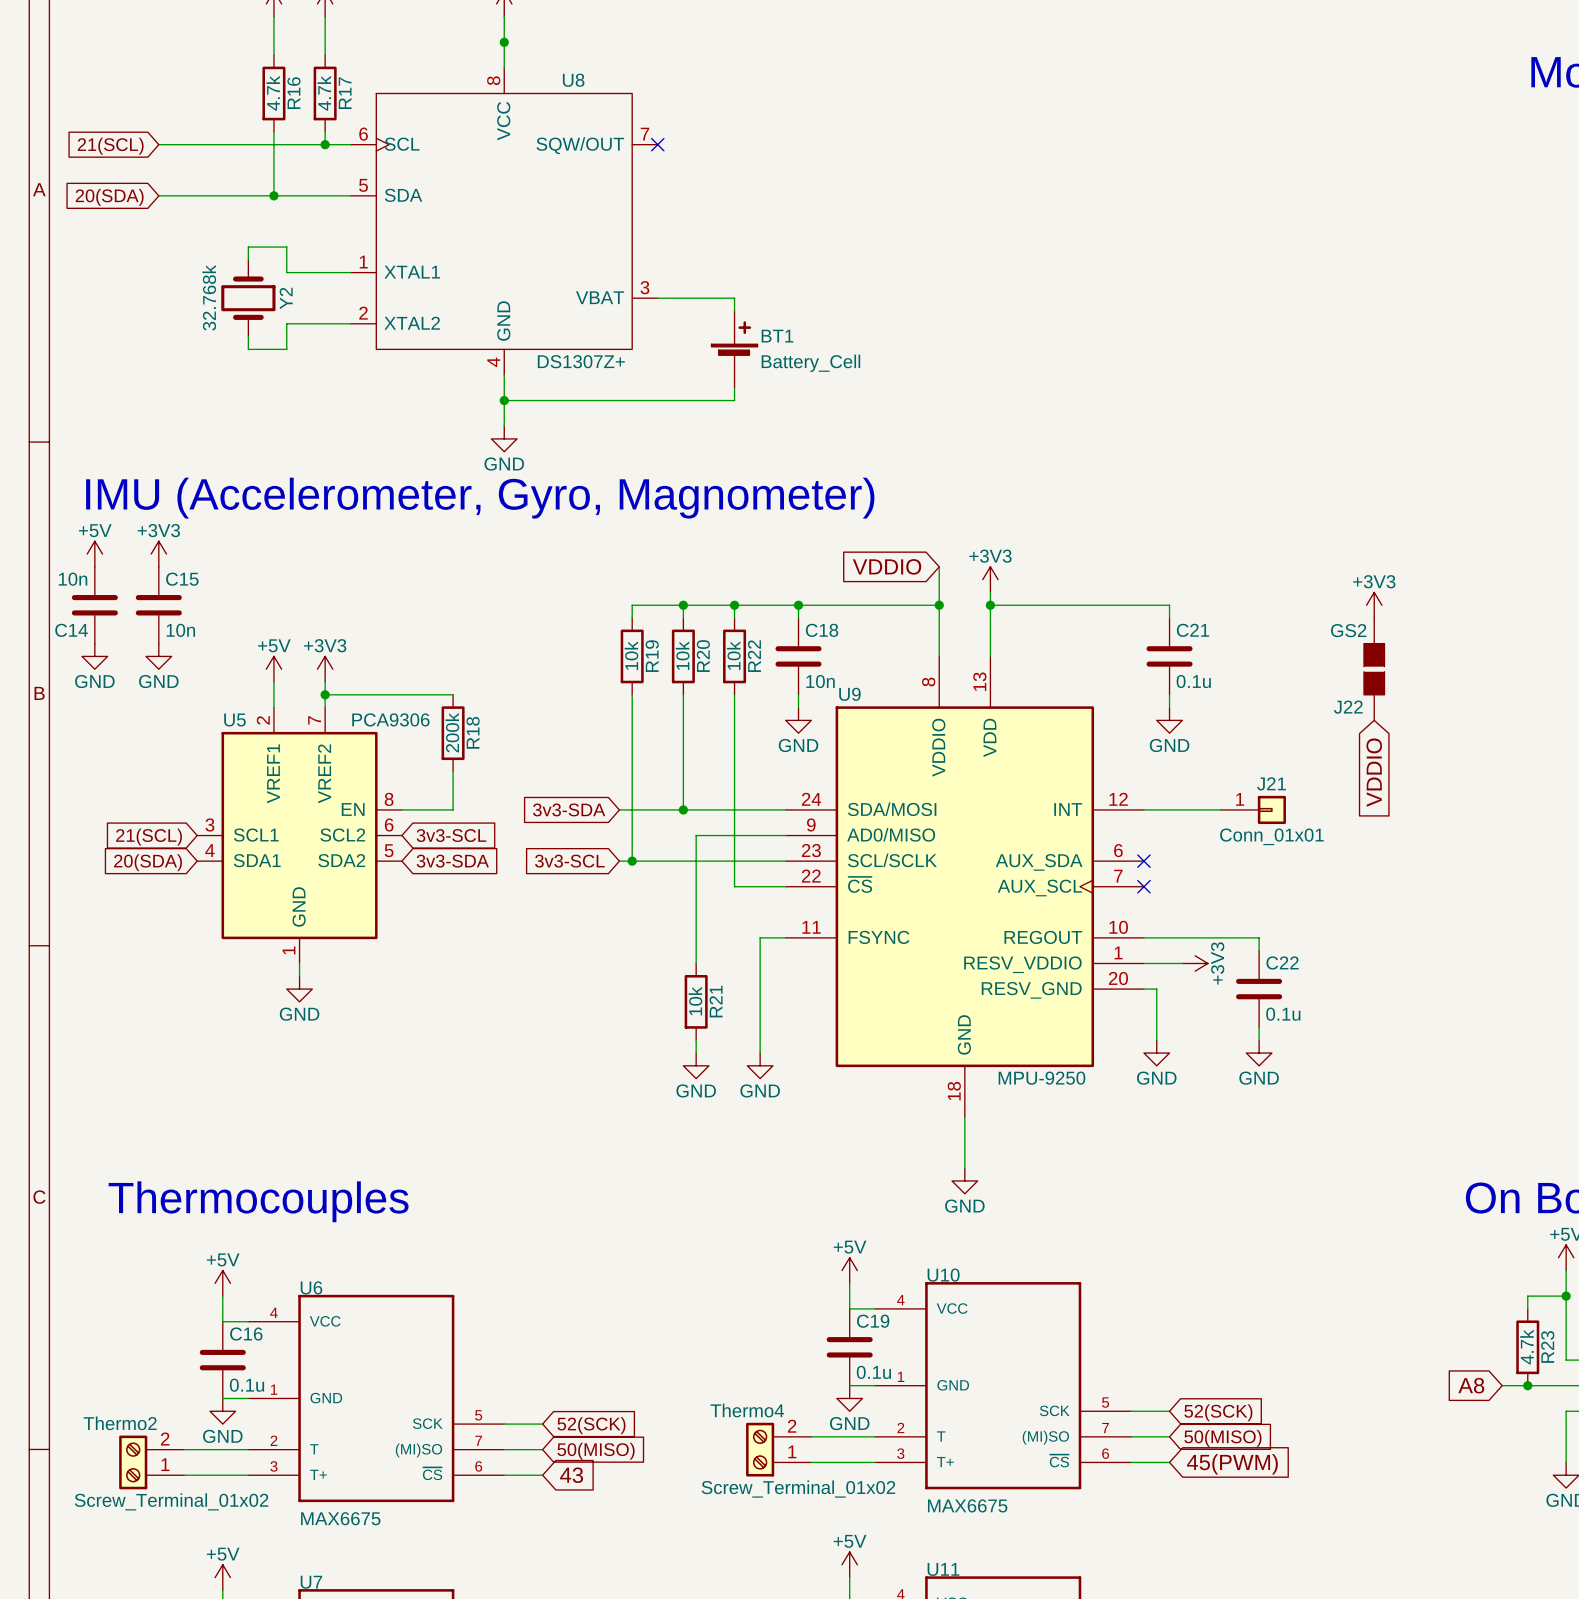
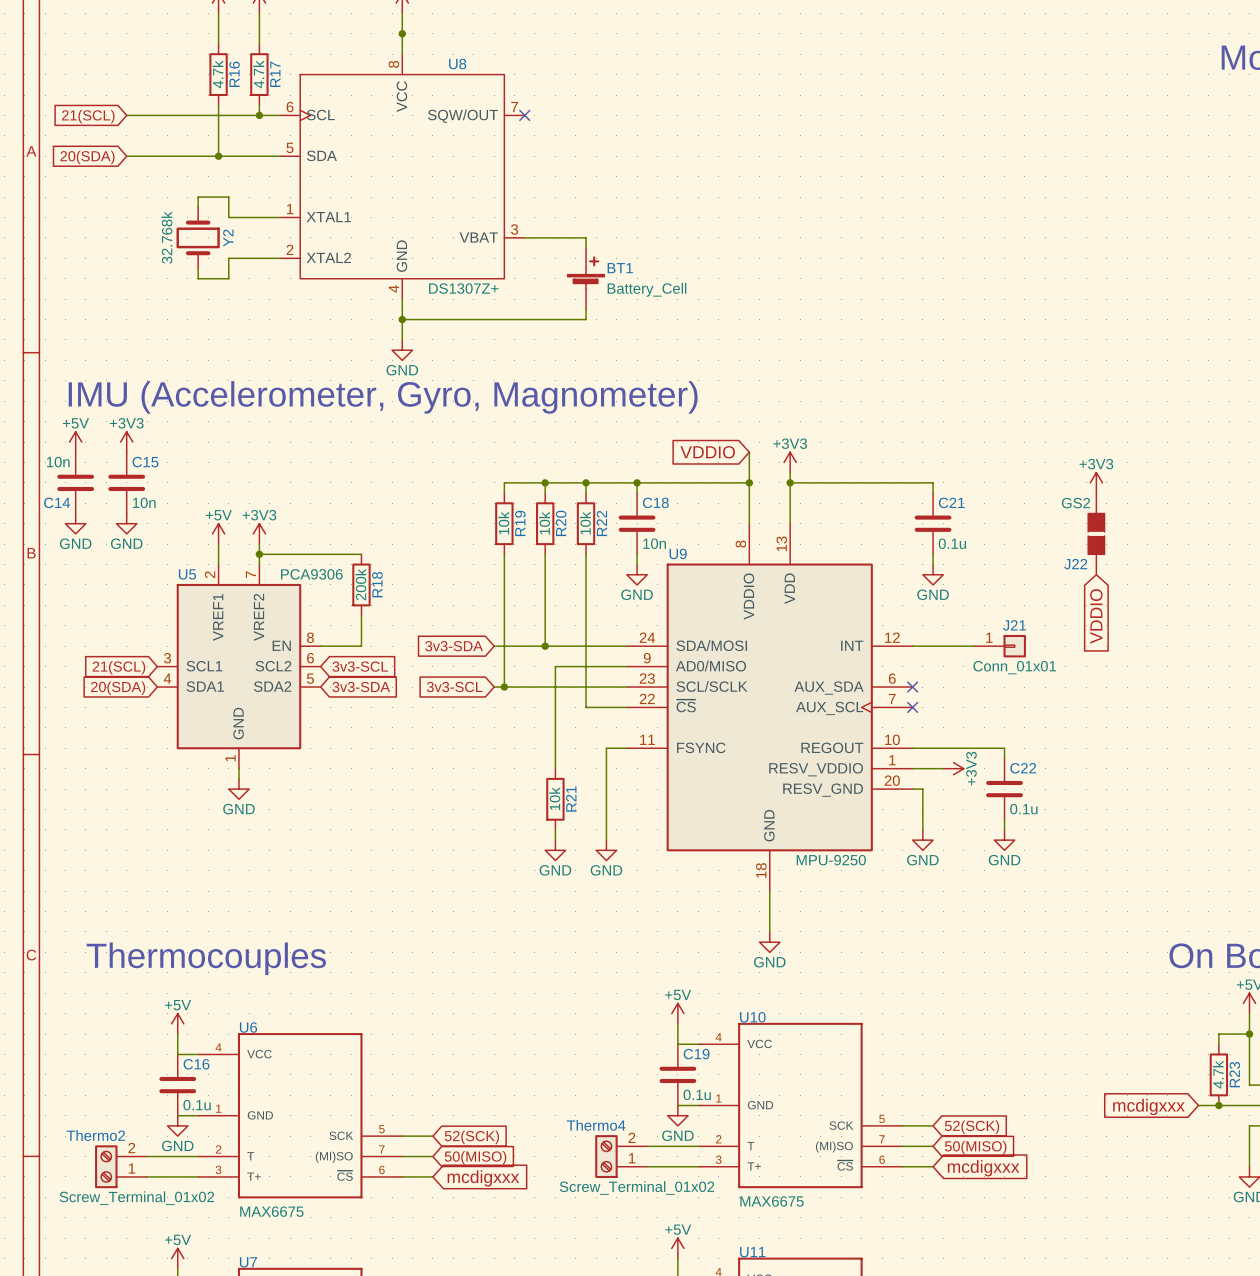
global label: A8 (1471, 1385) -> mcdigxxx (1148, 1107)
global label: 45(PWM) (1232, 1464) -> mcdigxxx (983, 1168)
global label: 43 (571, 1475) -> mcdigxxx (483, 1178)

